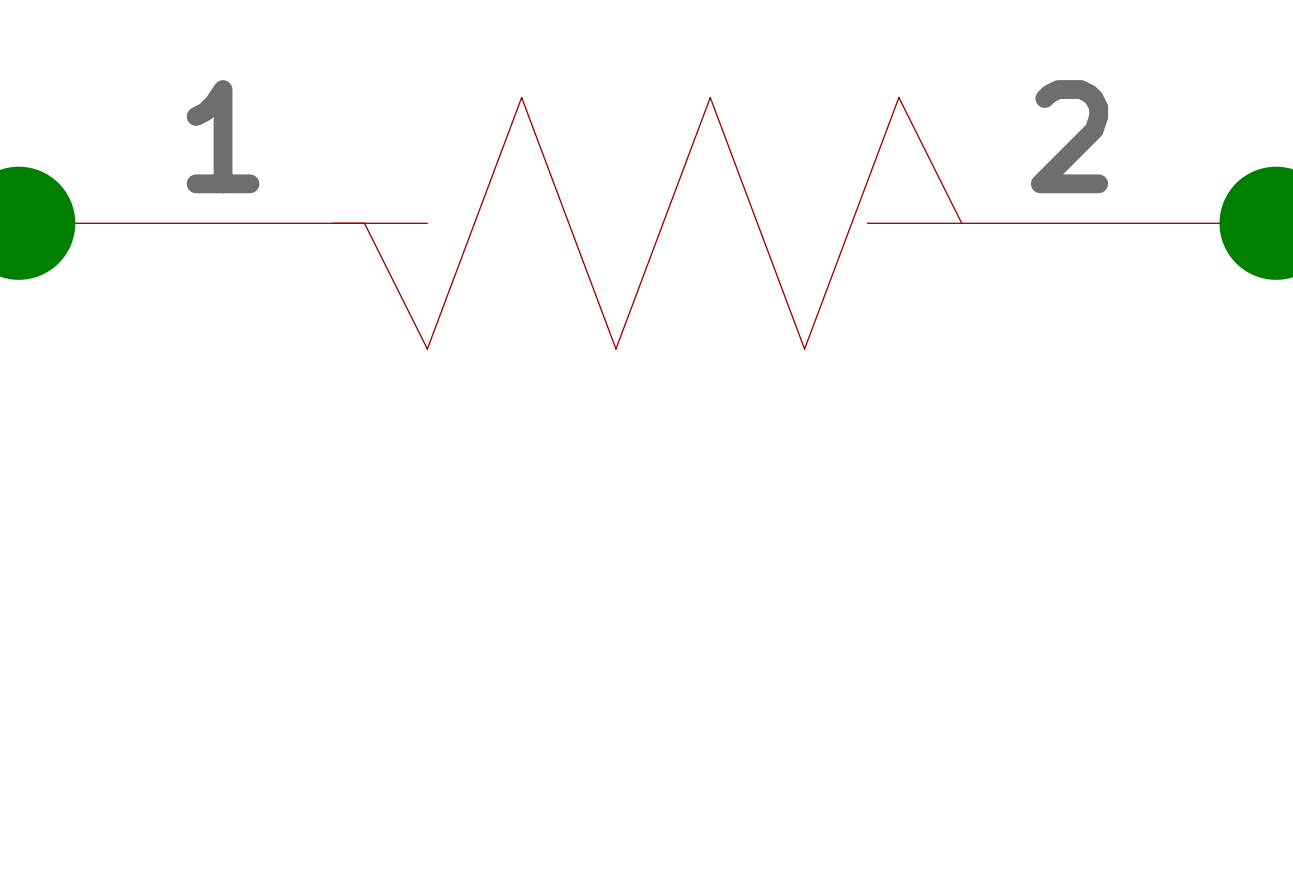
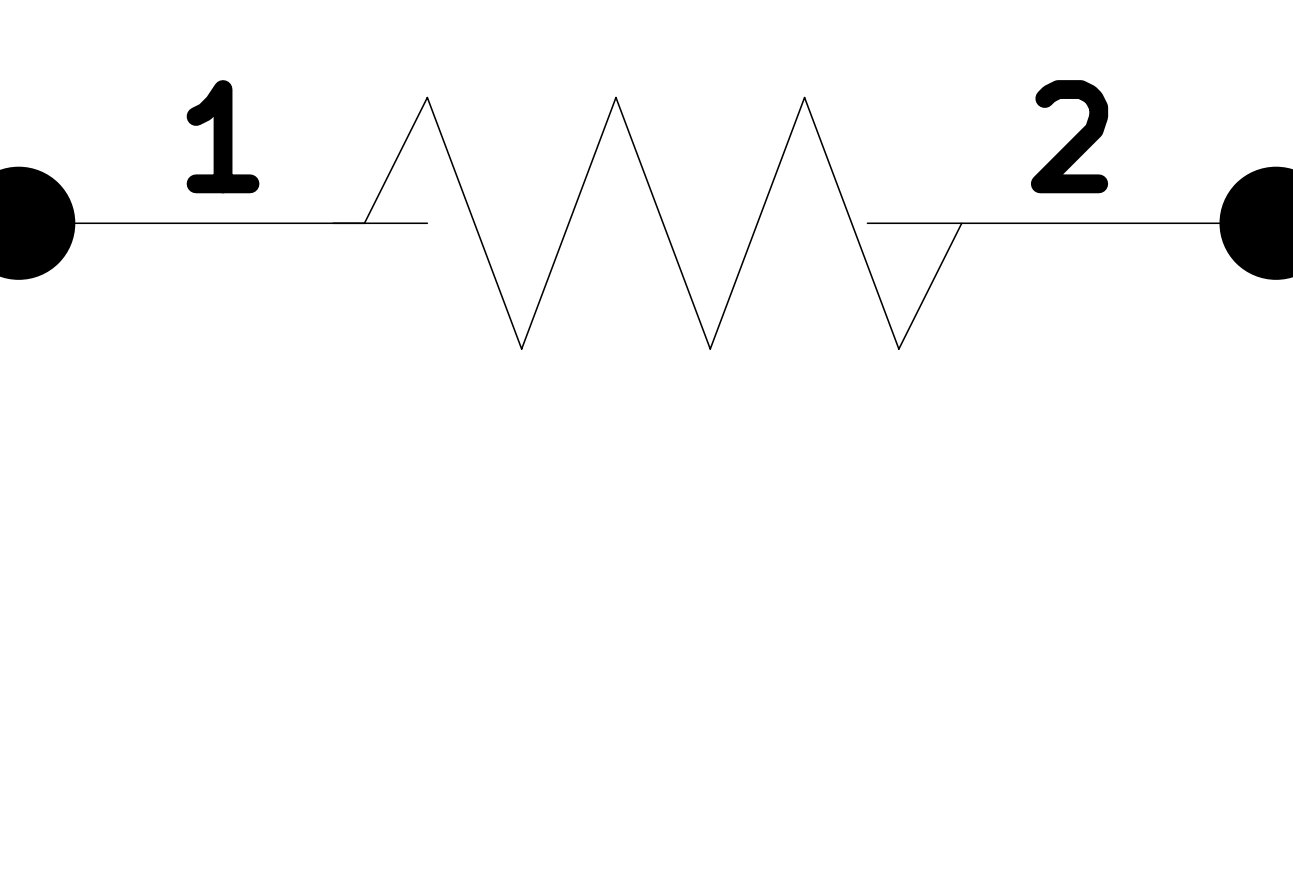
part flip: as is (647, 223) -> up-down (647, 223)

